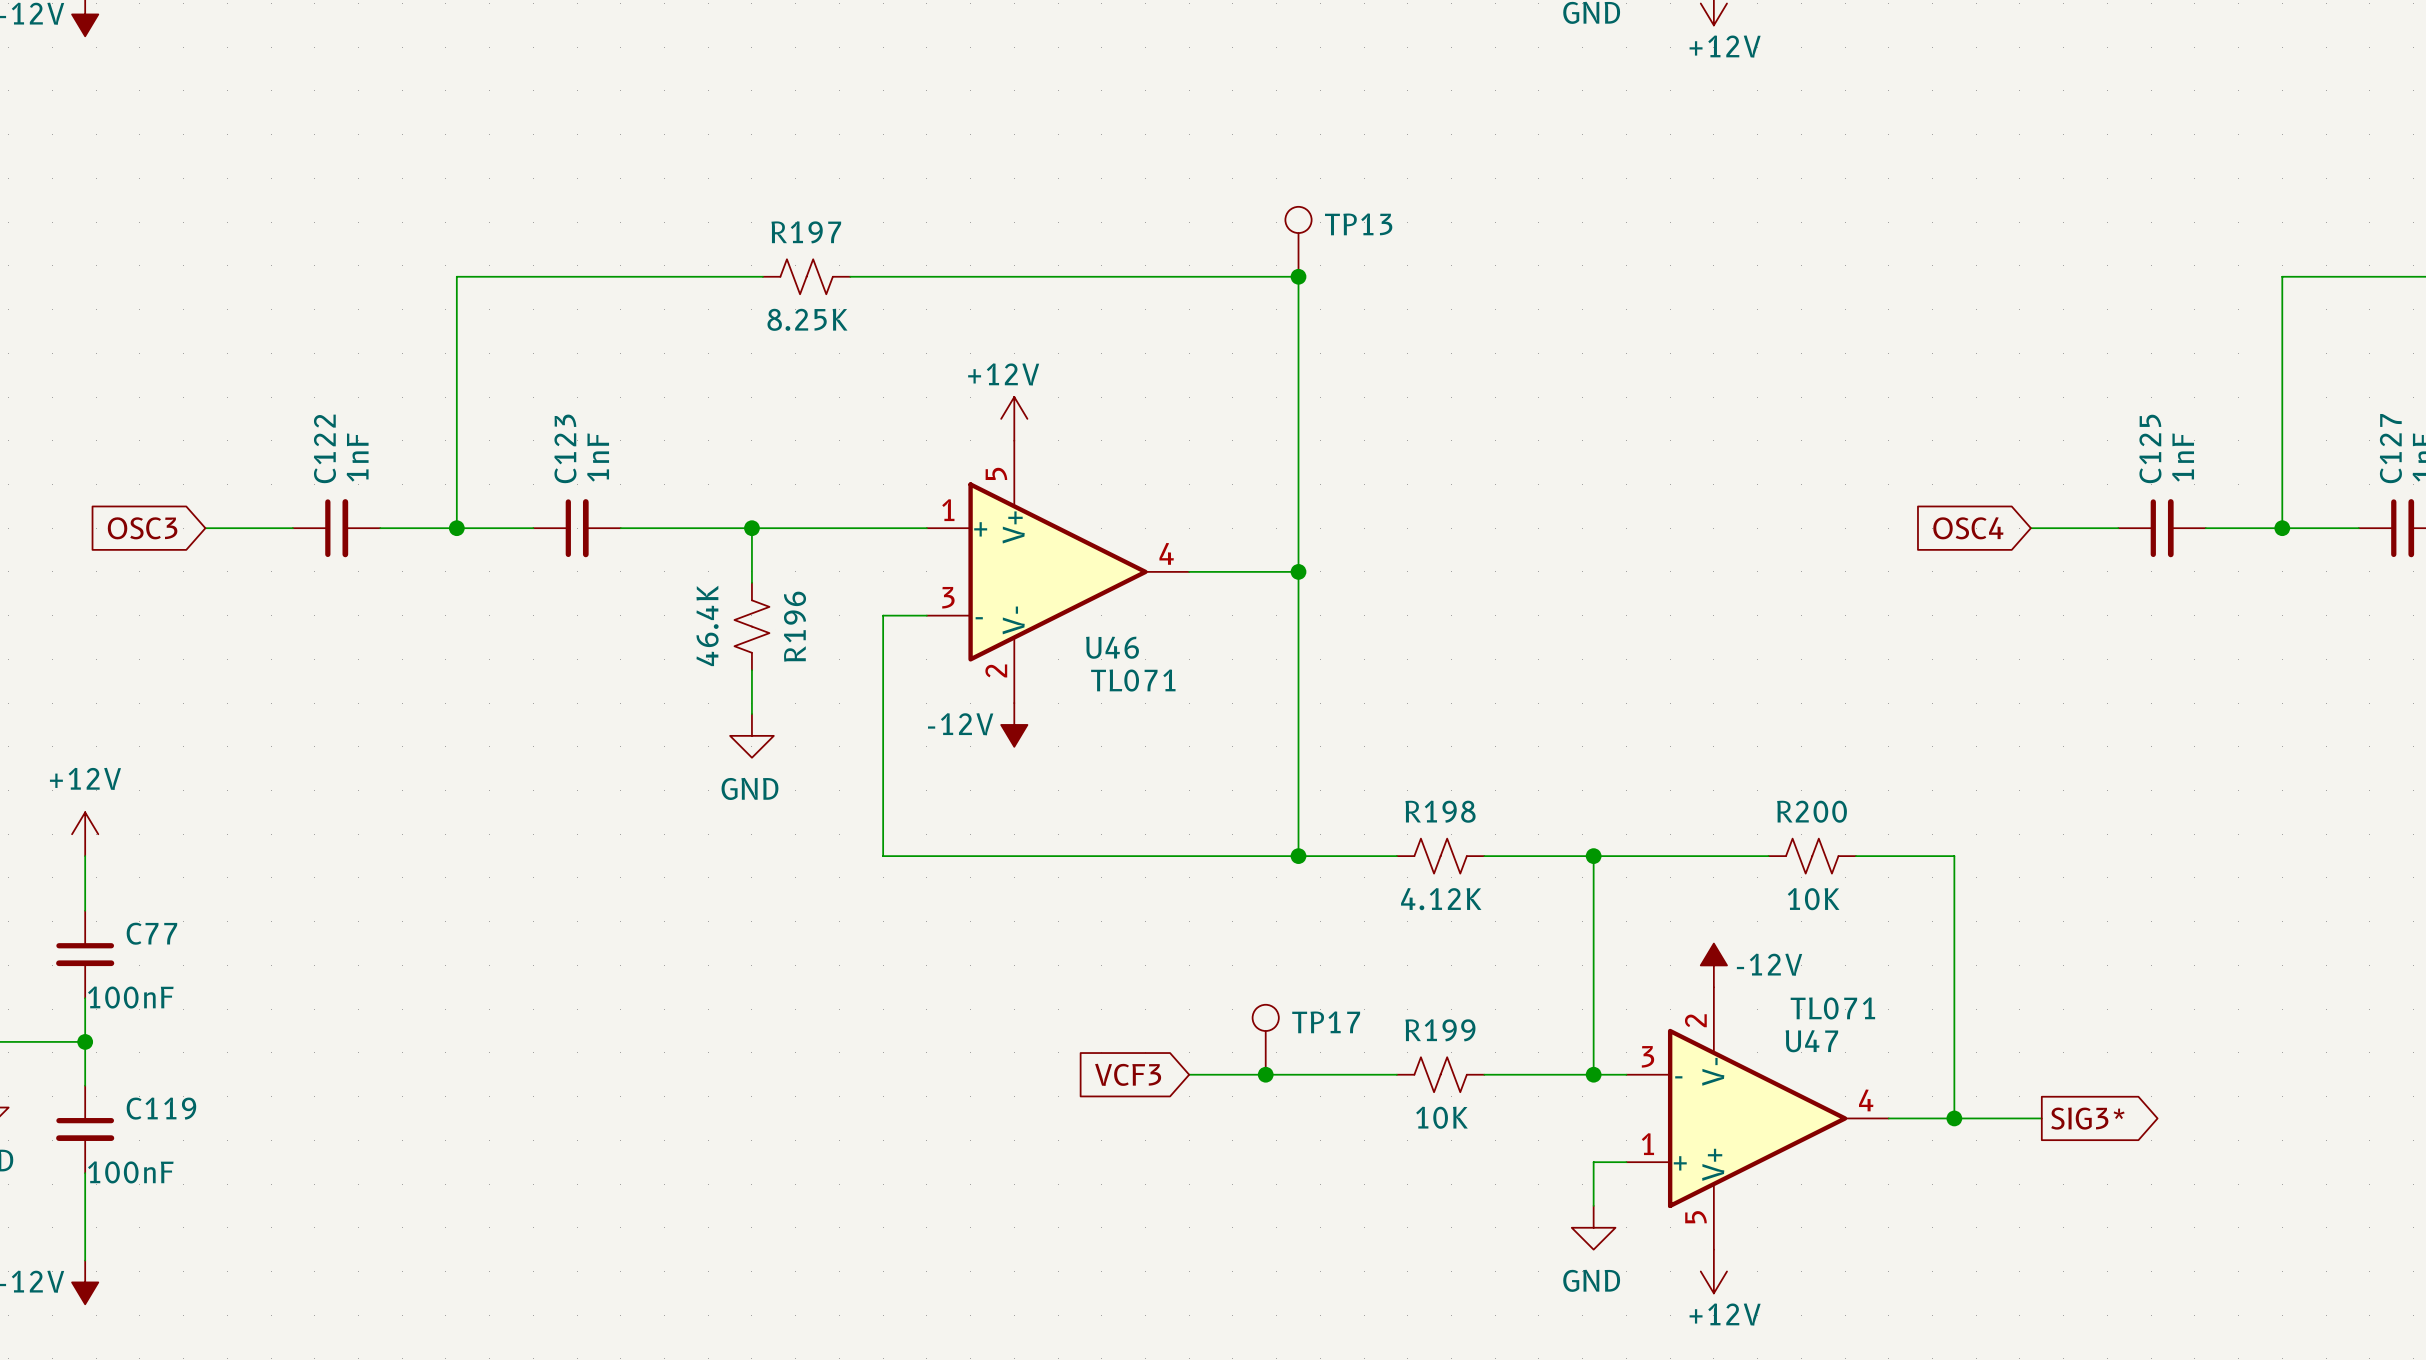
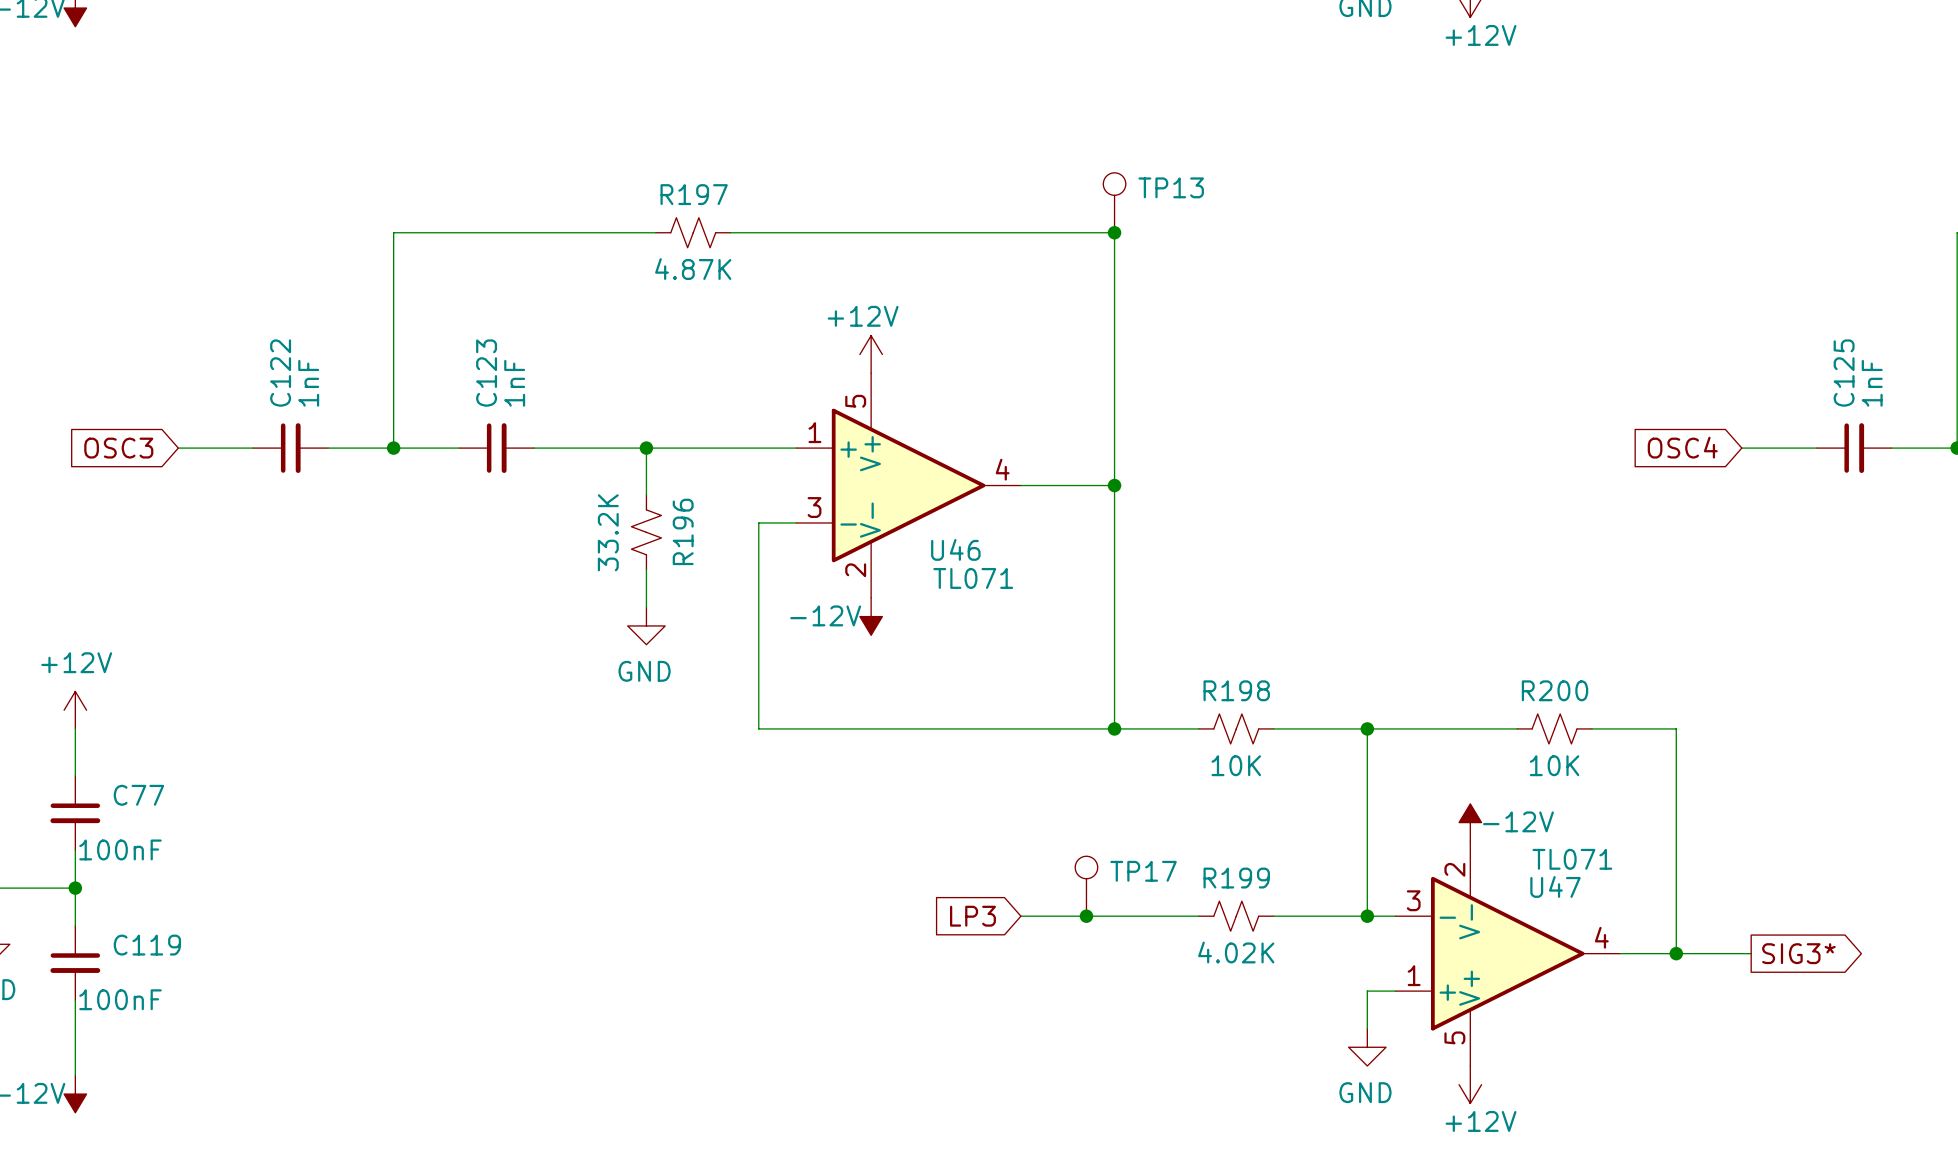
R197 value: 8.25K (807, 319) -> 4.87K (693, 269)
R196 value: 46.4K (707, 625) -> 33.2K (608, 532)
R198 value: 4.12K (1441, 899) -> 10K (1236, 765)
global label: VCF3 (1128, 1074) -> LP3 (972, 916)
R199 value: 10K (1441, 1117) -> 4.02K (1236, 952)

